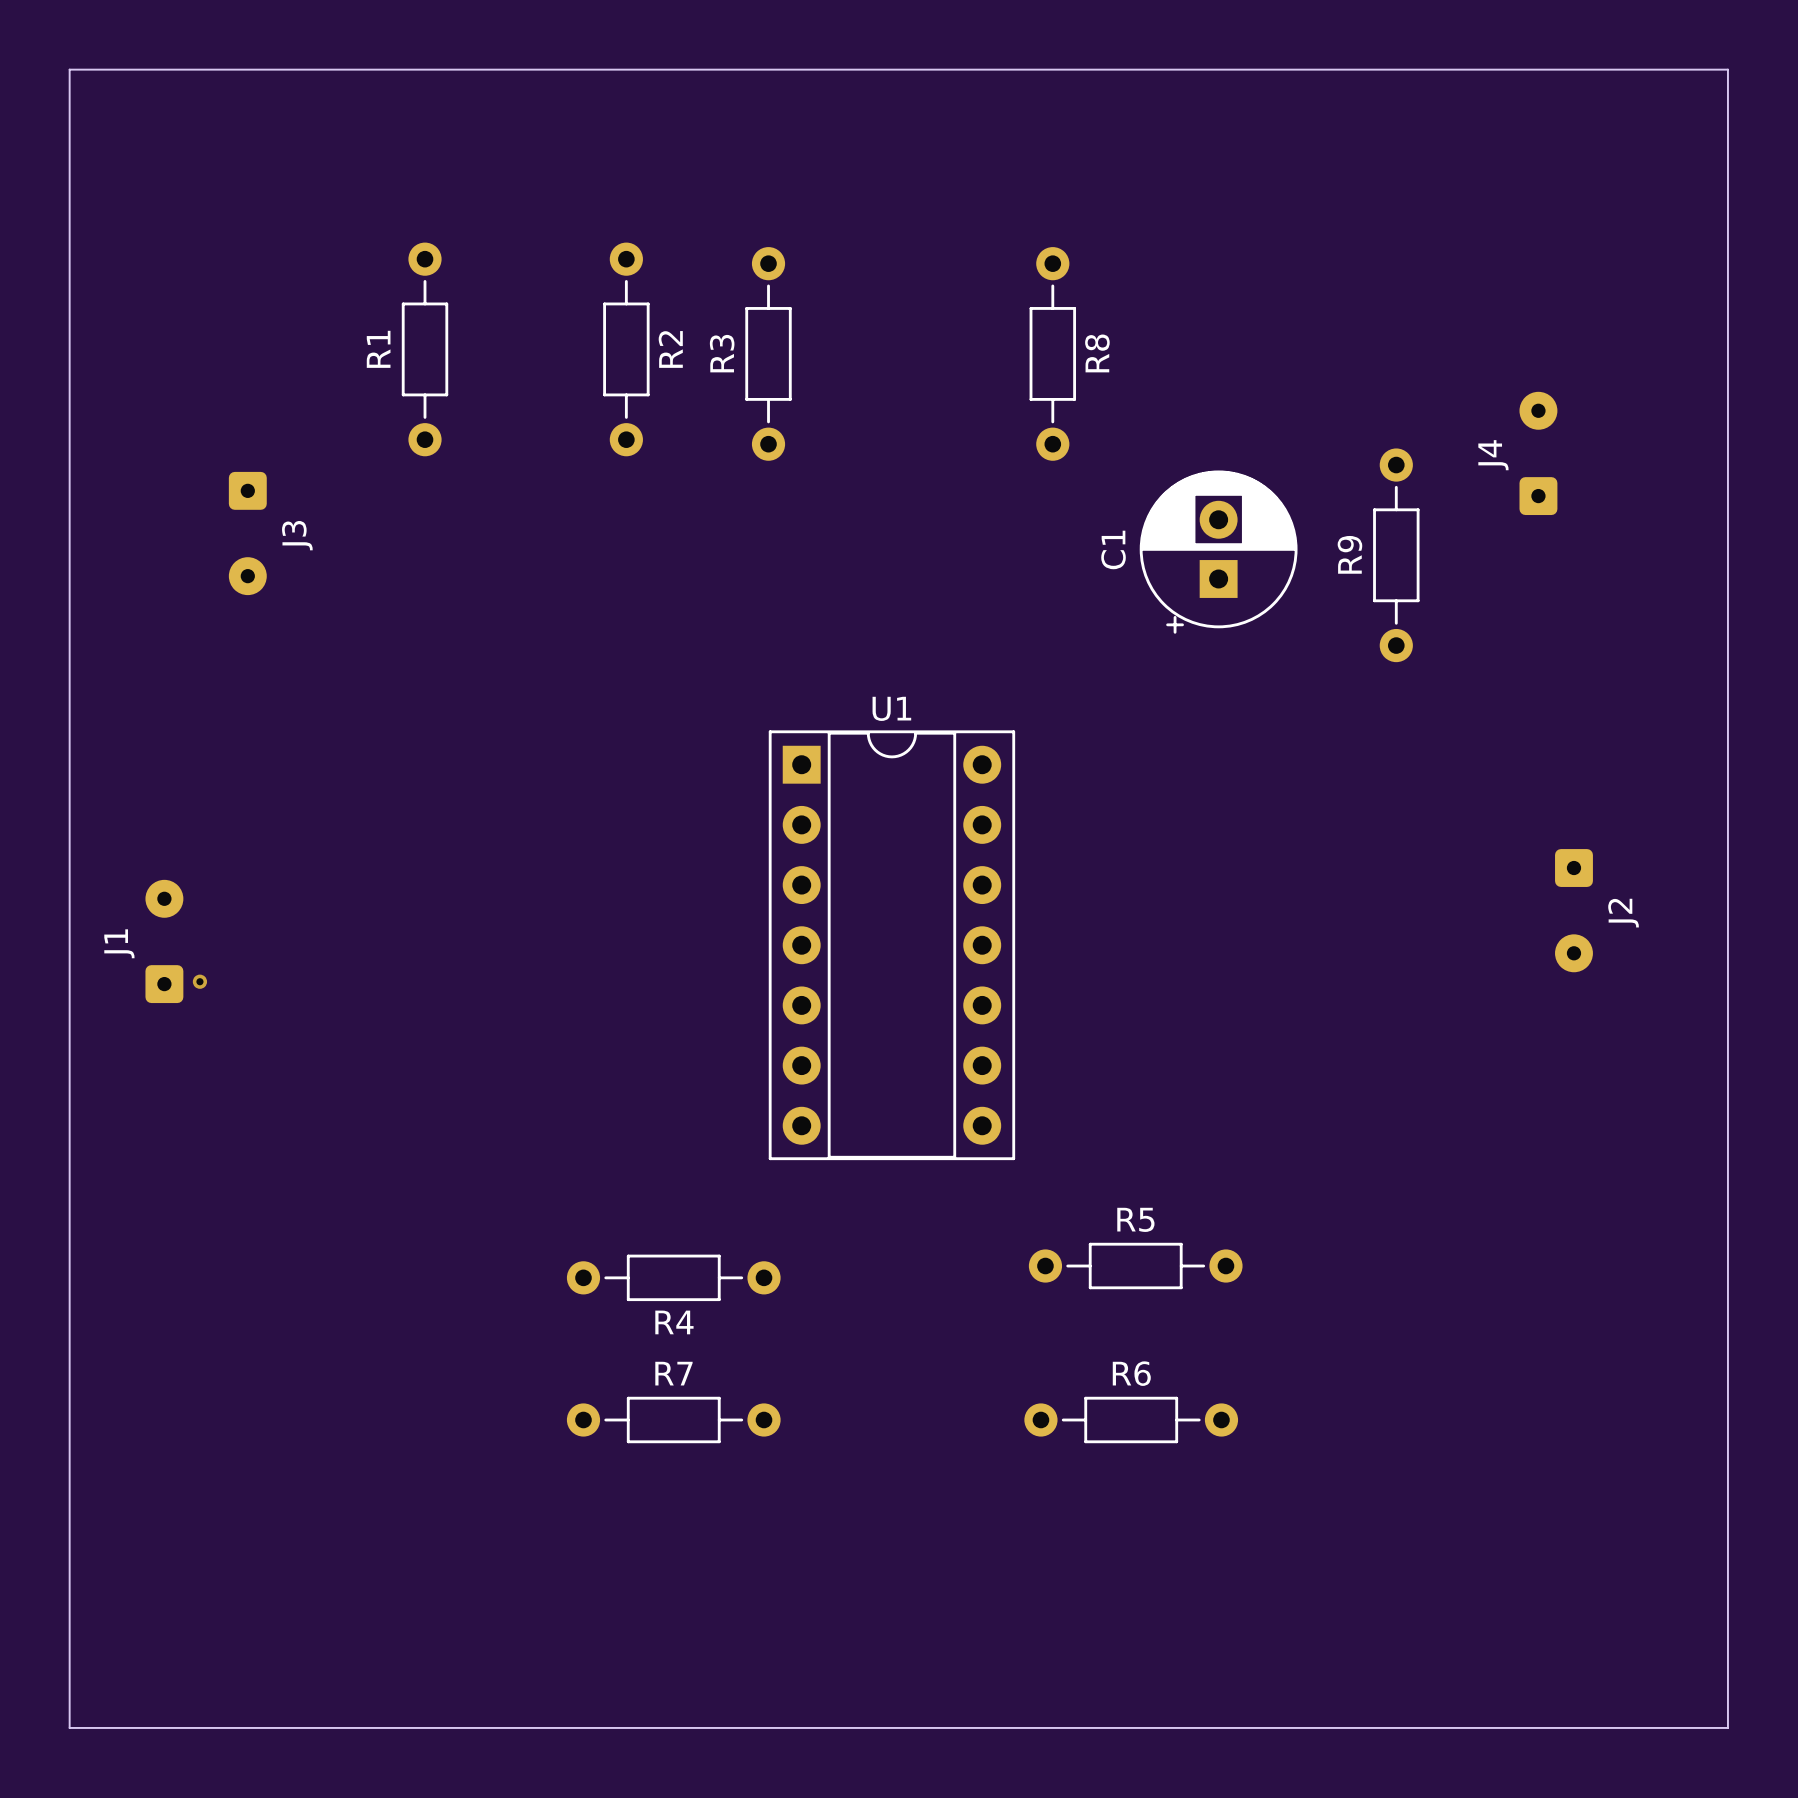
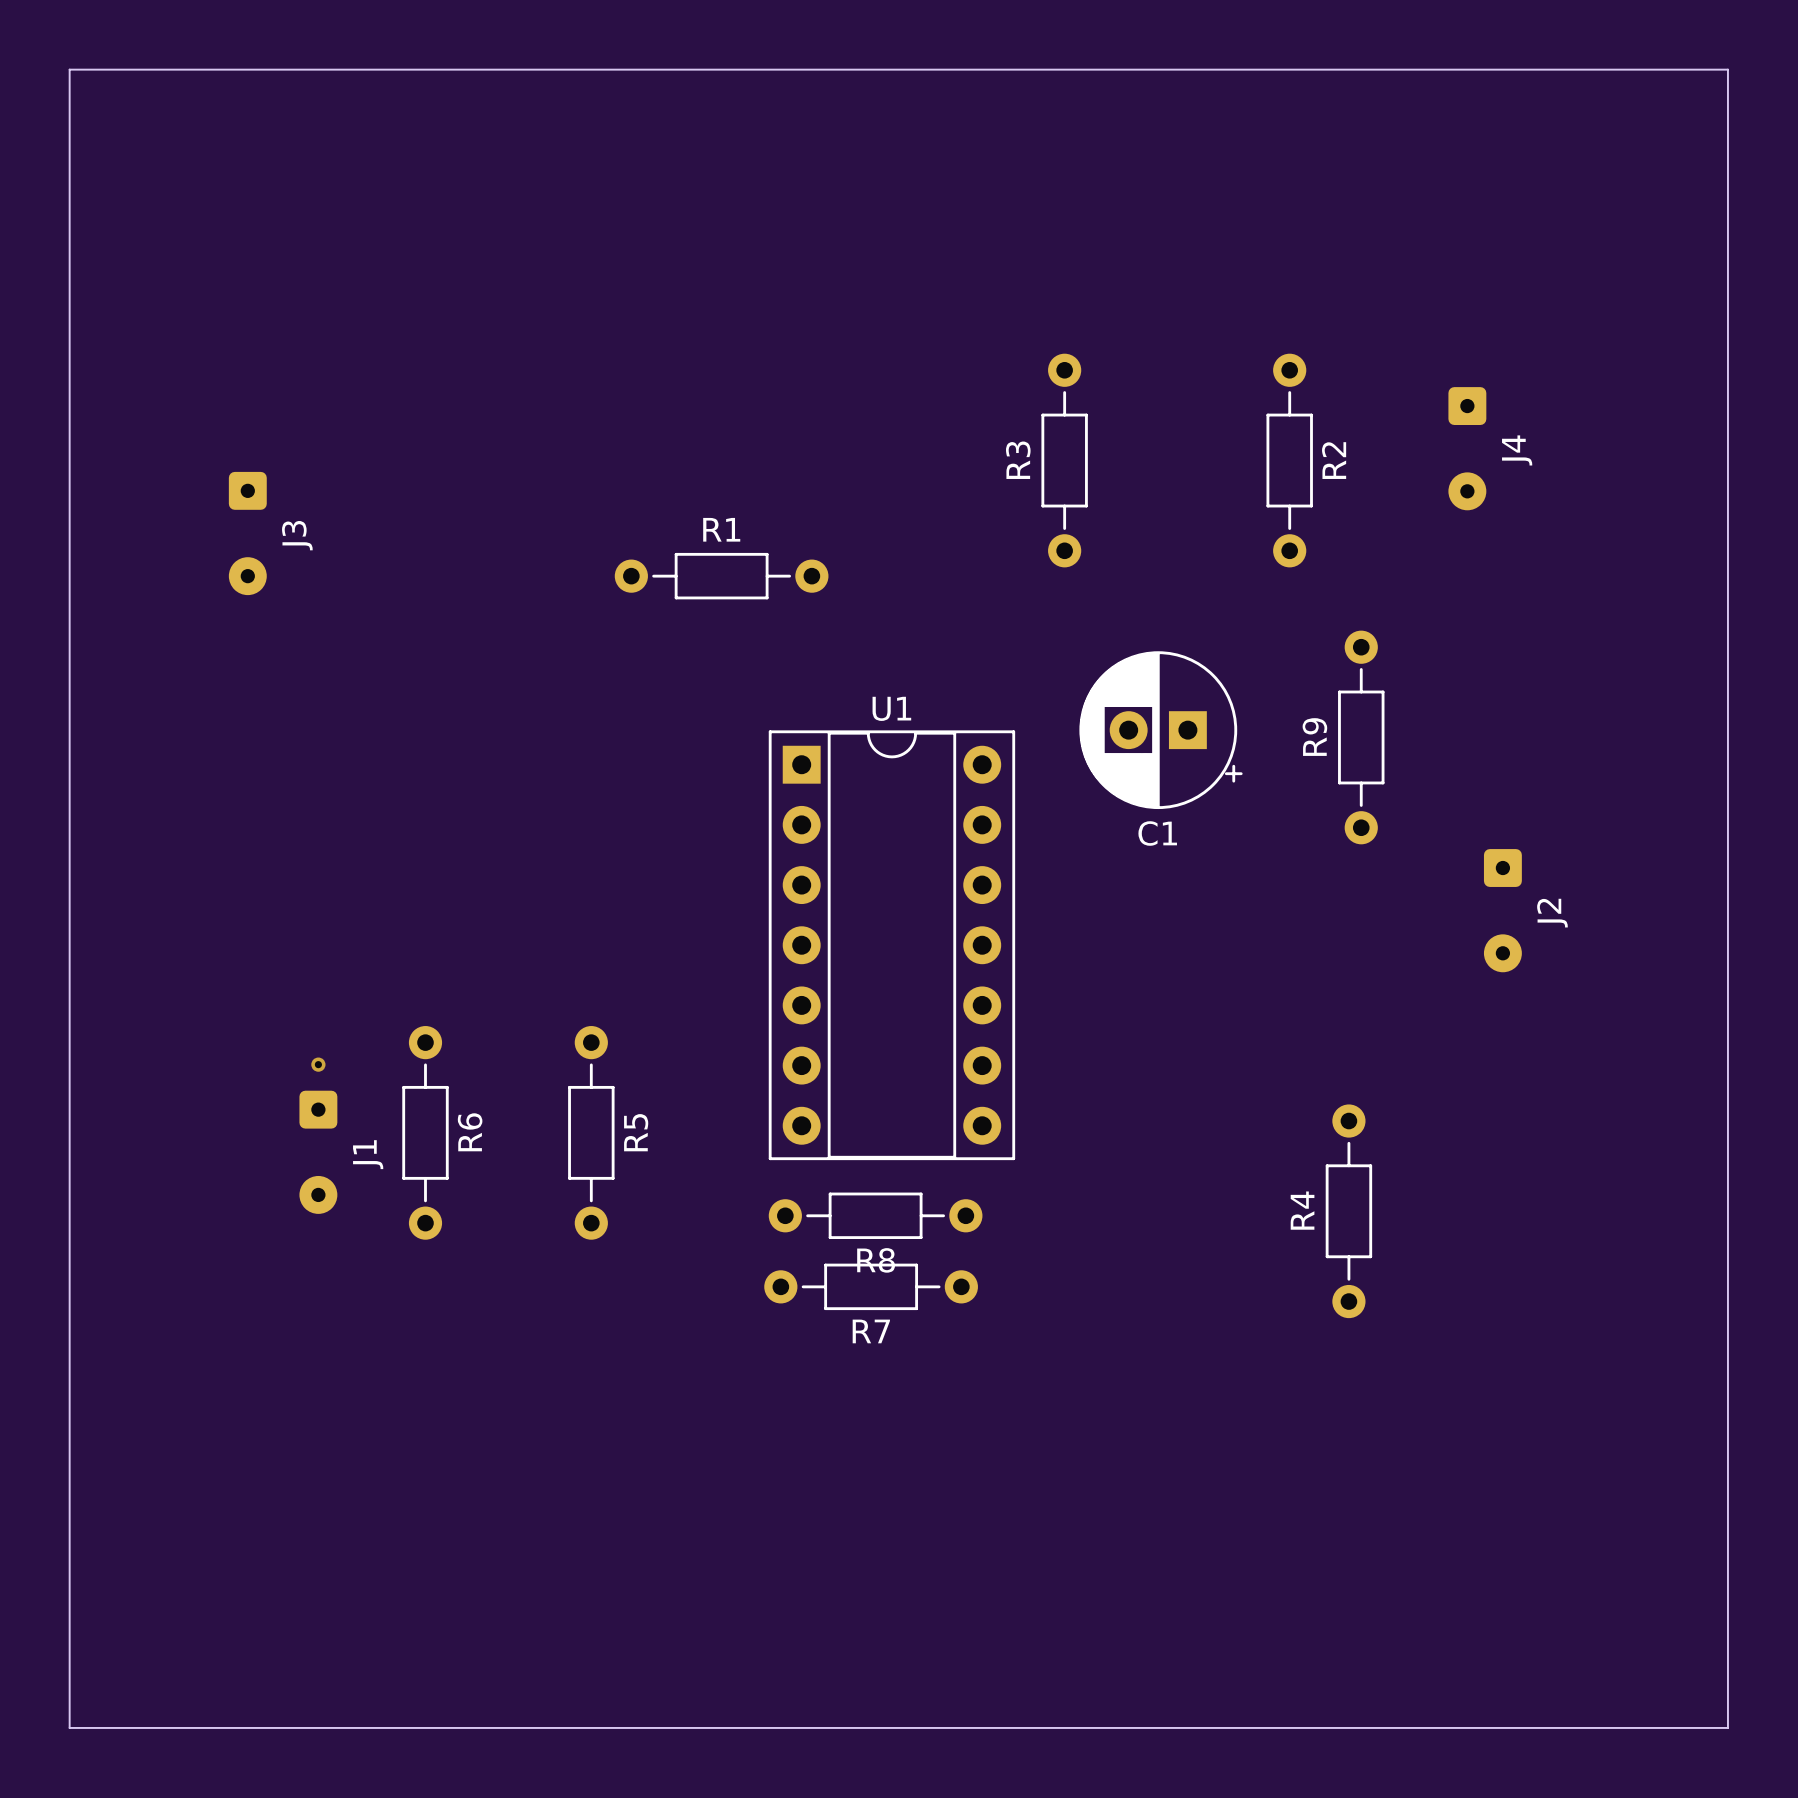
R1 rotation: 0° (425, 349) -> 90° clockwise (721, 576)
R1 position: (425, 349) -> (721, 576)
R2 position: (626, 349) -> (1289, 460)
R3 position: (768, 353) -> (1064, 460)
R8 rotation: 0° (1052, 353) -> 90° clockwise (875, 1215)
R8 position: (1052, 353) -> (875, 1215)
J4 rotation: 0° (1538, 453) -> 180° (1467, 448)
C1 rotation: 0° (1218, 552) -> 90° counterclockwise (1161, 730)
C1 position: (1218, 552) -> (1161, 730)
R9 position: (1396, 555) -> (1361, 737)
J2 position: (1573, 910) -> (1502, 910)
J1 rotation: 0° (164, 941) -> 180° (318, 1152)
J1 position: (164, 941) -> (318, 1152)
via: (199, 981) -> none
via: none -> (318, 1064)
R5 rotation: 0° (1135, 1266) -> 90° clockwise (591, 1132)
R5 position: (1135, 1266) -> (591, 1132)
R4 rotation: 0° (673, 1277) -> 90° clockwise (1348, 1211)
R4 position: (673, 1277) -> (1348, 1211)
R7 name position: R7 (673, 1373) -> R7 (871, 1331)
R7 position: (673, 1419) -> (871, 1286)
R6 rotation: 0° (1131, 1419) -> 90° clockwise (425, 1132)
R6 position: (1131, 1419) -> (425, 1132)

